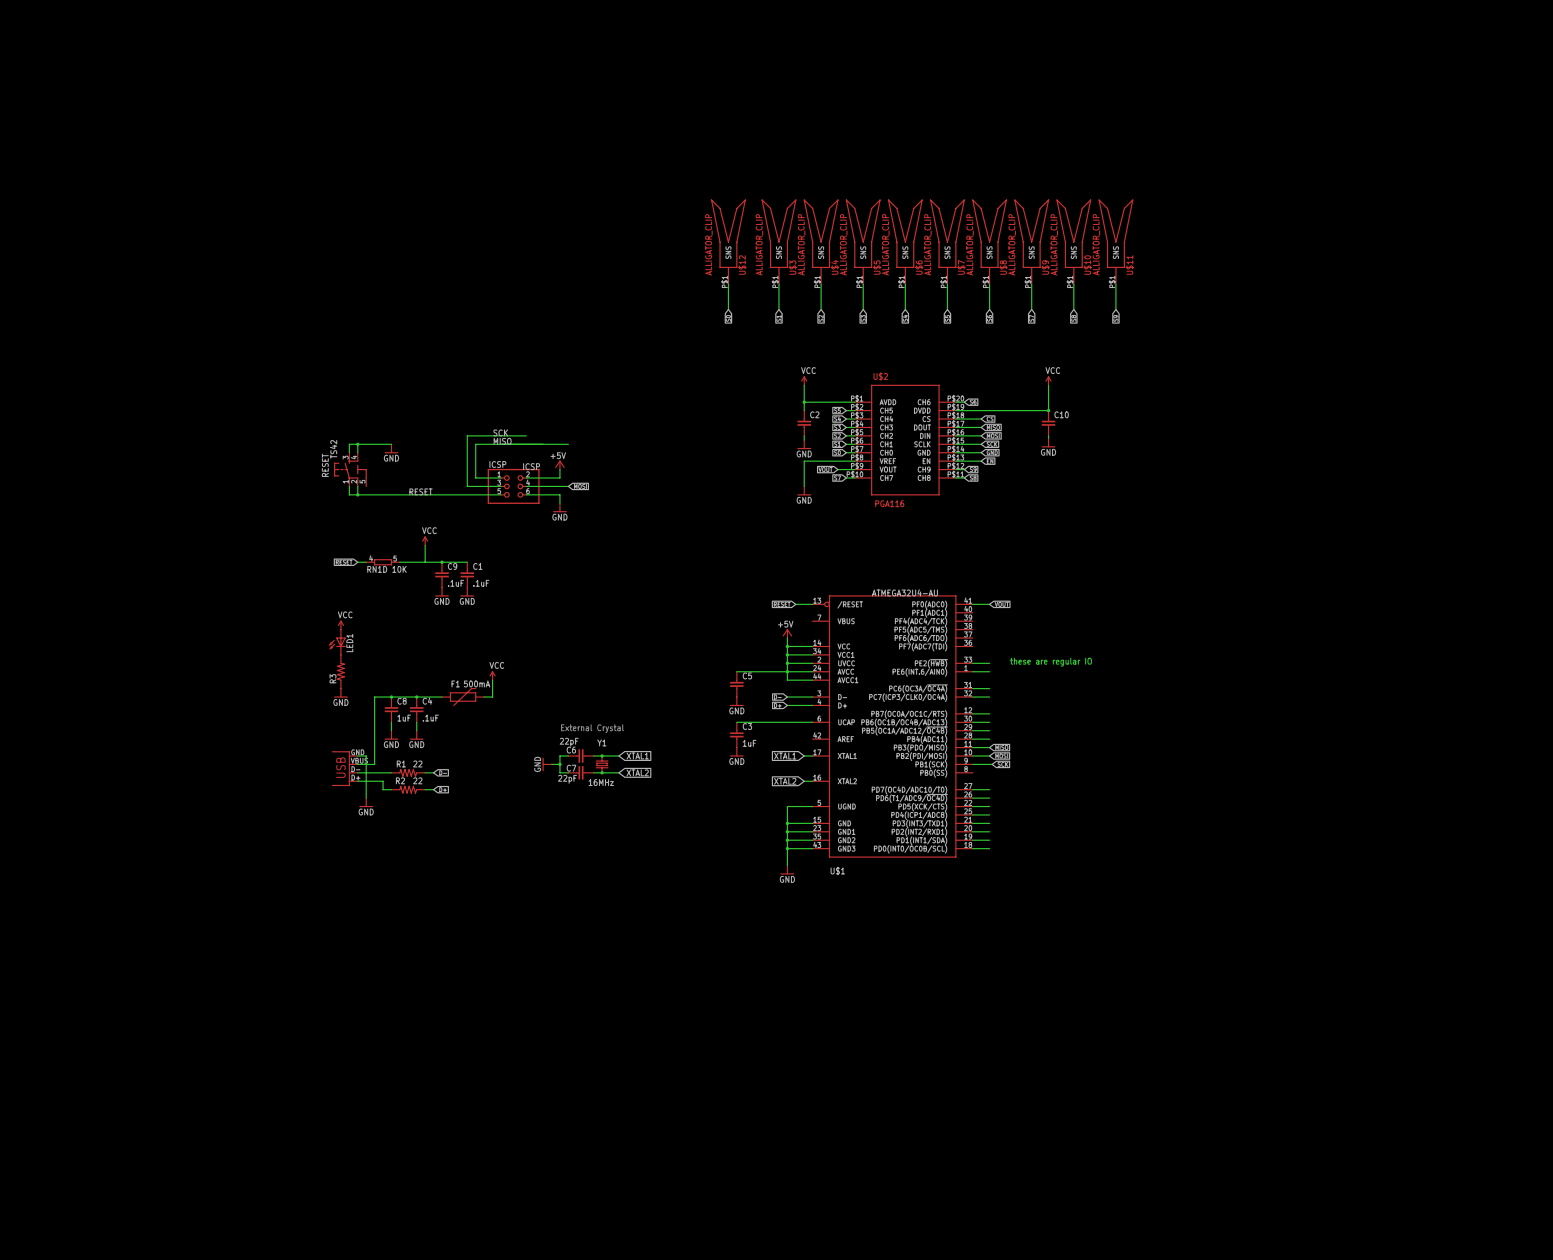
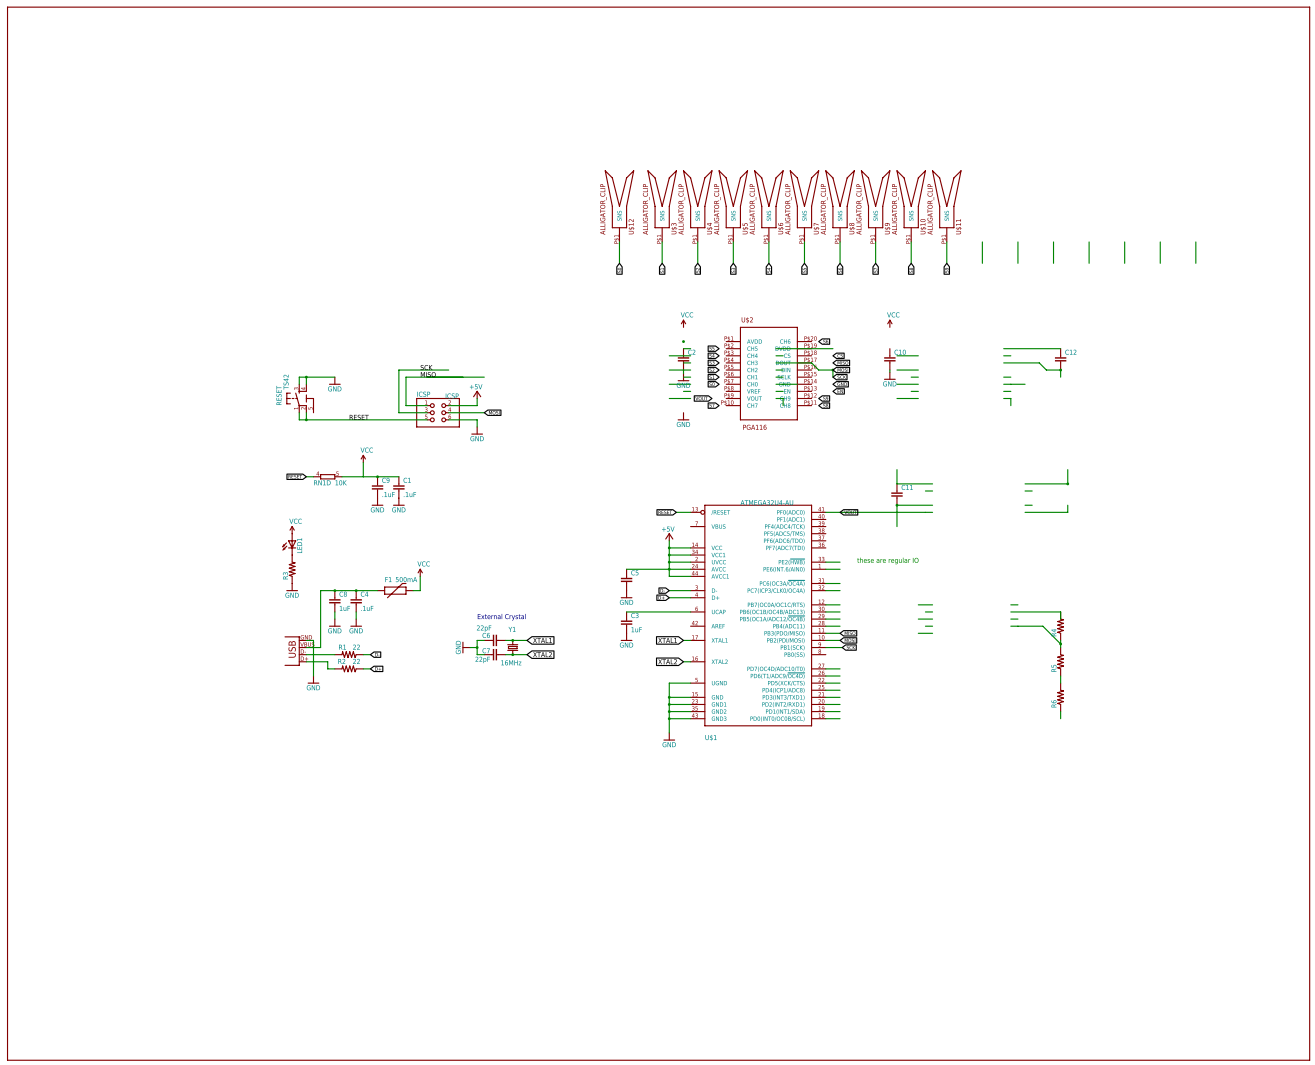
line: none -> (7, 7) (1309, 7) (1309, 1060) (7, 1060) (7, 7)
wire: none -> (982, 241) (982, 263)
wire: none -> (1017, 241) (1017, 263)
wire: none -> (1053, 241) (1053, 263)
wire: none -> (1089, 241) (1089, 263)
wire: none -> (1124, 241) (1124, 263)
wire: none -> (1160, 241) (1160, 263)
wire: none -> (1195, 241) (1195, 263)
wire: (804, 385) (804, 410) -> (690, 348) (683, 348)
wire: (1048, 385) (1048, 410) (981, 410) -> none
wire: (804, 402) (854, 402) -> none
wire: (955, 402) (964, 402) -> (776, 370) (783, 370)
wire: (846, 410) (854, 410) -> (776, 355) (783, 355)
wire: none -> (776, 348) (811, 348)
junction: (1048, 410) -> none
wire: none -> (1003, 348) (1060, 348)
wire: none -> (669, 355) (690, 355)
wire: (846, 419) (854, 419) -> none
wire: (955, 419) (981, 419) -> none
wire: none -> (896, 355) (918, 355)
wire: none -> (1003, 355) (1010, 355)
part: none -> (1060, 359)
wire: (846, 427) (854, 427) -> (683, 362) (690, 362)
wire: (955, 427) (981, 427) -> none
wire: none -> (1003, 362) (1039, 362) (1046, 370) (1060, 370) (1060, 377)
wire: none -> (669, 370) (690, 370)
wire: (846, 435) (854, 435) -> none
wire: (955, 435) (964, 435) -> (776, 362) (811, 362) (818, 370)
wire: none -> (896, 370) (918, 370)
junction: none -> (1060, 370)
wire: (846, 444) (854, 444) -> (683, 377) (690, 377)
wire: (955, 444) (981, 444) -> (832, 370) (832, 377)
wire: none -> (911, 377) (918, 377)
wire: none -> (1003, 377) (1010, 377)
wire: none -> (669, 384) (690, 384)
wire: (846, 452) (854, 452) -> none
wire: (955, 452) (981, 452) -> (776, 384) (797, 384)
wire: none -> (896, 384) (918, 384)
wire: none -> (1003, 384) (1025, 384)
wire: (804, 461) (804, 486) -> none
wire: (812, 461) (854, 461) -> none
wire: (955, 461) (981, 461) -> none
wire: none -> (911, 391) (918, 391)
wire: none -> (1003, 391) (1010, 391)
wire: none -> (669, 398) (690, 398)
wire: (837, 469) (854, 469) -> none
wire: none -> (776, 398) (783, 398) (783, 405)
wire: (955, 469) (964, 469) -> (776, 391) (783, 391)
wire: none -> (896, 398) (918, 398)
wire: none -> (1003, 398) (1010, 398) (1010, 405)
wire: (846, 478) (854, 478) -> none
wire: (955, 478) (964, 478) -> (776, 377) (783, 377)
wire: none -> (896, 469) (896, 483) (932, 483)
wire: none -> (1067, 469) (1067, 483) (1025, 483)
junction: none -> (1067, 483)
wire: none -> (925, 491) (932, 491)
wire: none -> (1025, 491) (1032, 491)
part: none -> (896, 494)
junction: none -> (896, 505)
wire: none -> (932, 505) (896, 505) (896, 526)
wire: none -> (1025, 505) (1032, 505)
wire: none -> (1067, 505) (1067, 512) (1025, 512)
wire: none -> (840, 512) (932, 512)
wire: none -> (918, 604) (932, 604)
wire: none -> (1010, 604) (1017, 604)
wire: none -> (925, 611) (932, 611)
wire: none -> (1010, 611) (1060, 611) (1060, 619)
wire: none -> (918, 619) (932, 619)
wire: none -> (1010, 619) (1017, 619)
wire: none -> (925, 626) (932, 626)
wire: none -> (1010, 626) (1042, 626) (1060, 643)
part: none -> (1060, 626)
wire: none -> (918, 633) (932, 633)
wire: none -> (1060, 640) (1060, 647)
junction: none -> (1060, 643)
part: none -> (1060, 661)
wire: none -> (1060, 676) (1060, 683)
part: none -> (1060, 697)
wire: none -> (1060, 711) (1060, 718)

